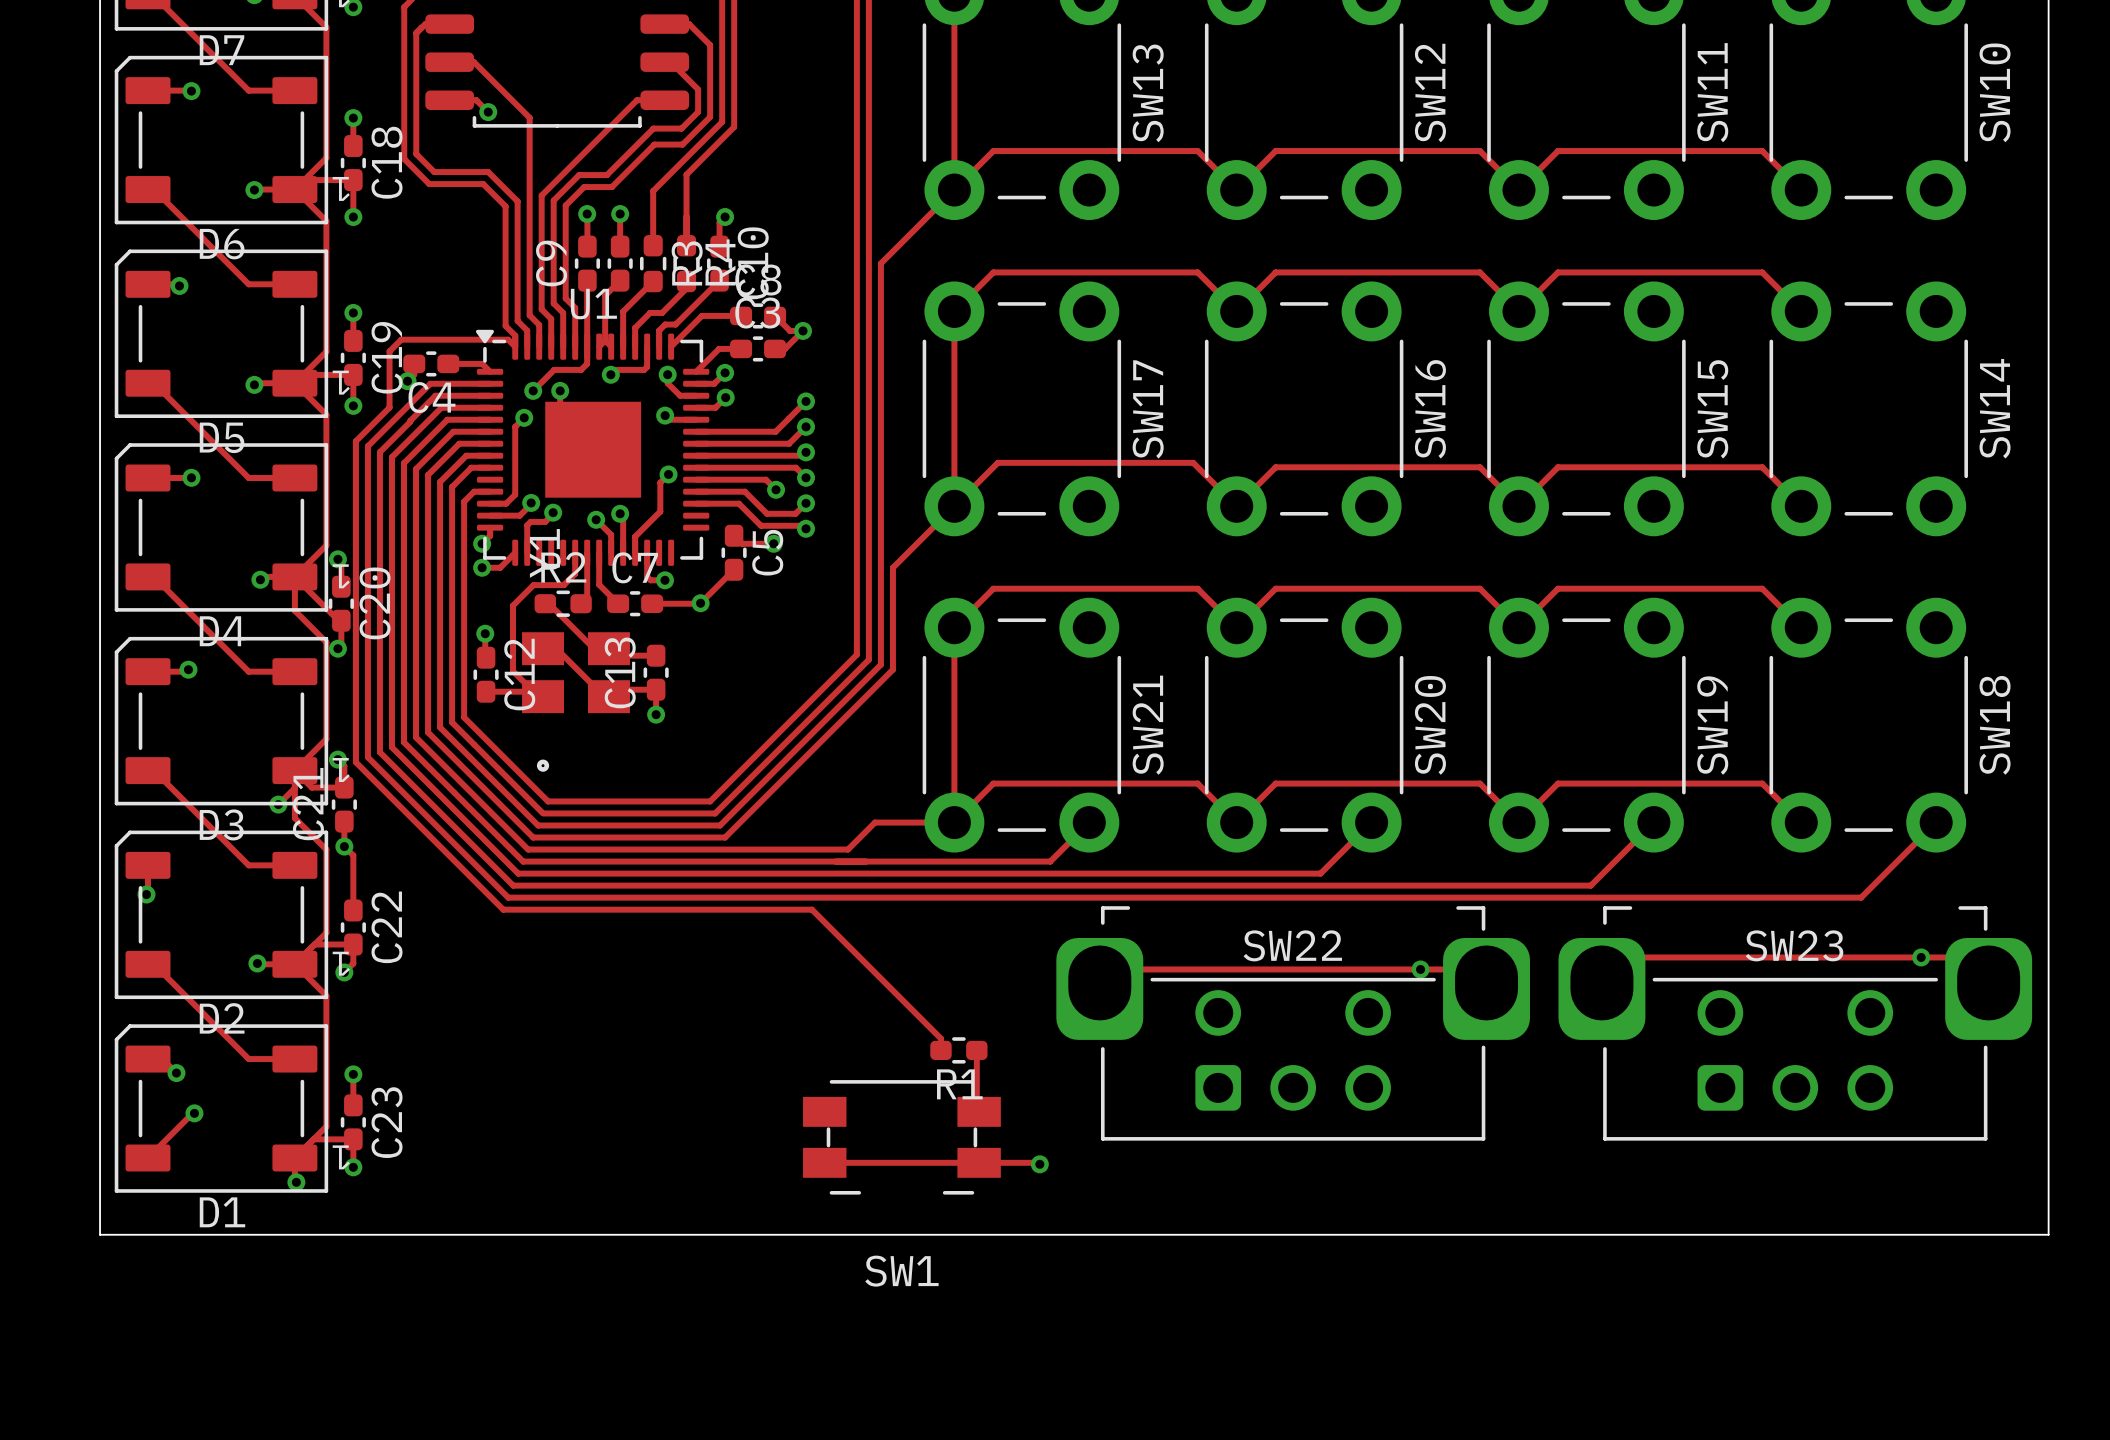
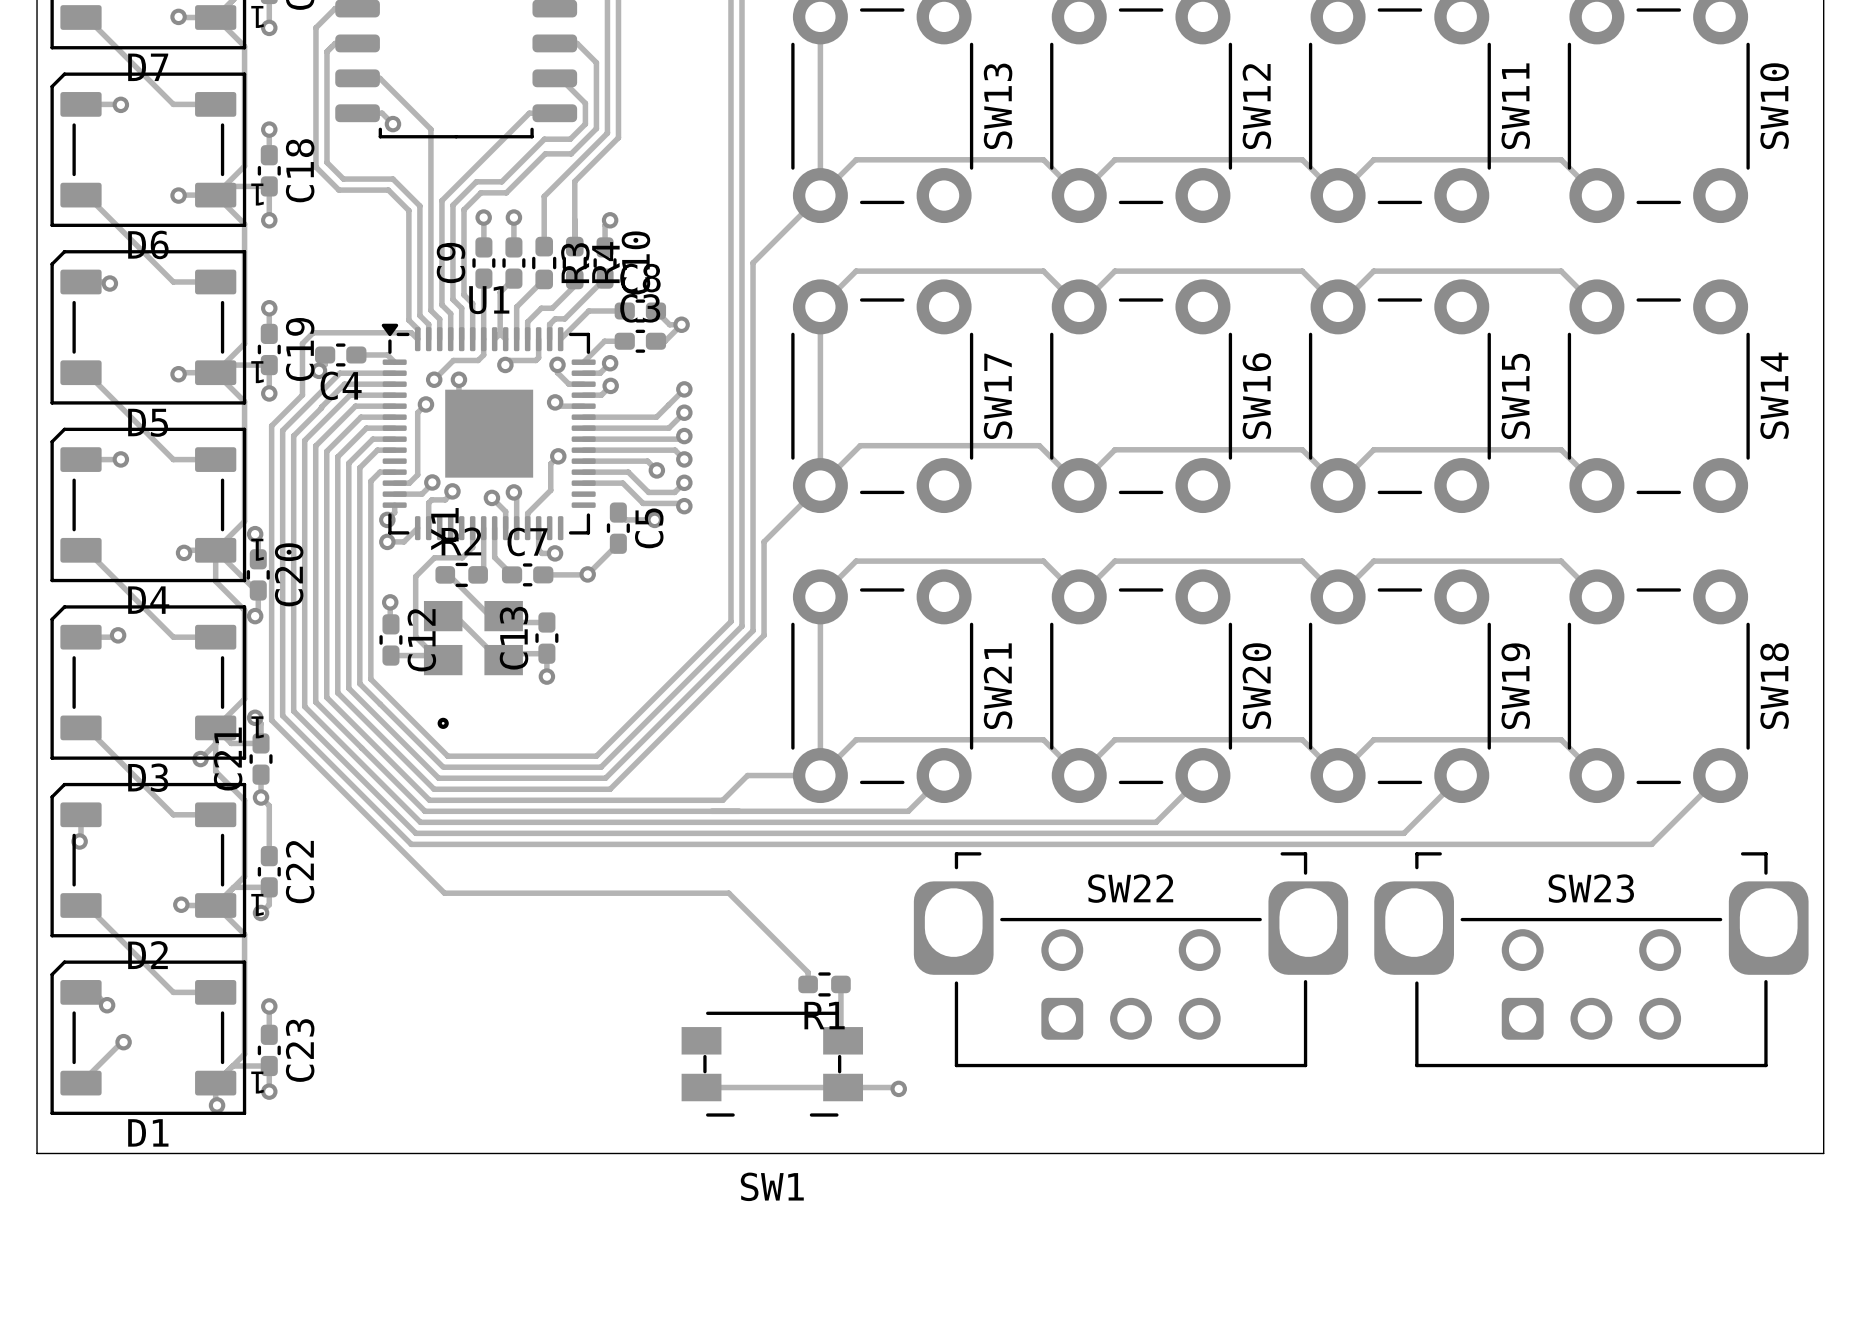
track: (503, 909) (812, 909) (940, 1038) -> (406, 855) (444, 893) (728, 893) (808, 973)
via: (1921, 957) -> none
via: (1420, 969) -> none
track: (1099, 982) (1113, 969) (1471, 969) (1486, 982) -> none
track: (1601, 982) (1627, 957) (1963, 957) (1988, 982) -> none

